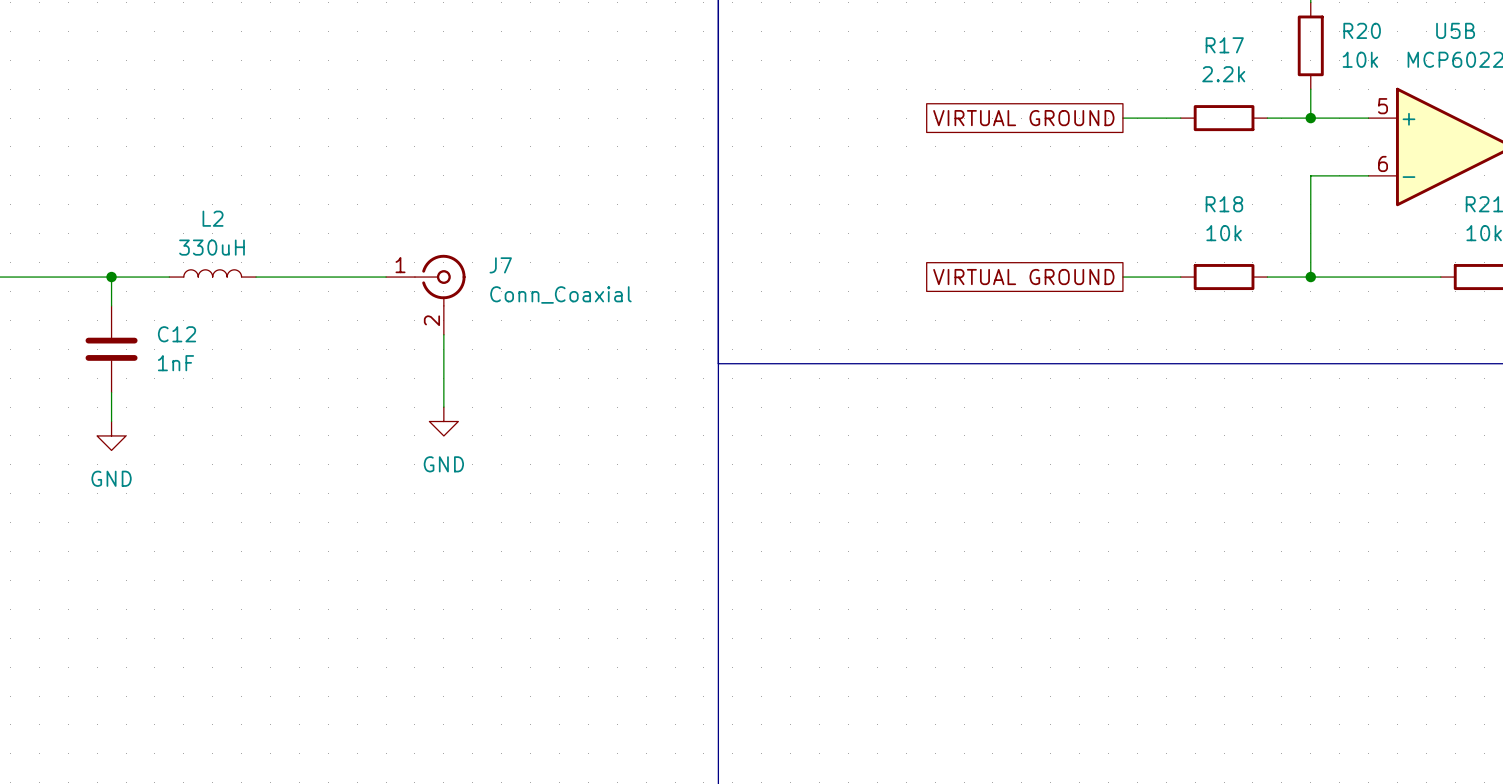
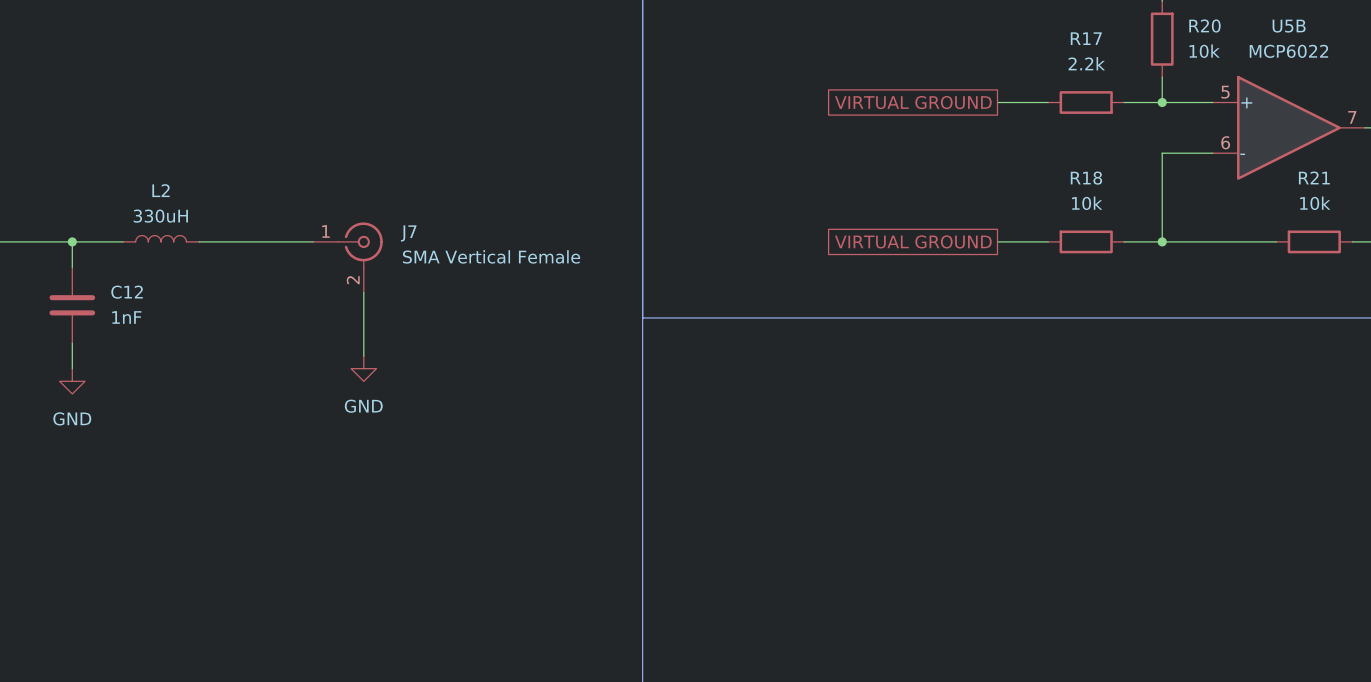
L2 position: (212, 273) -> (161, 238)
wire: (111, 277) (111, 305) -> (72, 241) (72, 267)
junction position: (111, 277) -> (72, 241)
wire: (126, 277) (169, 277) -> (199, 241) (237, 241)
J7 position: (425, 294) -> (347, 257)
J7 value: Conn_Coaxial (560, 294) -> SMA Vertical Female (491, 256)
wire: (443, 334) (443, 407) -> (363, 292) (363, 355)
C12 position: (111, 349) -> (72, 305)
wire: (111, 392) (111, 421) -> (72, 343) (72, 368)
power symbol position: GND (443, 421) -> GND (363, 368)
power symbol position: GND (111, 435) -> GND (72, 381)

